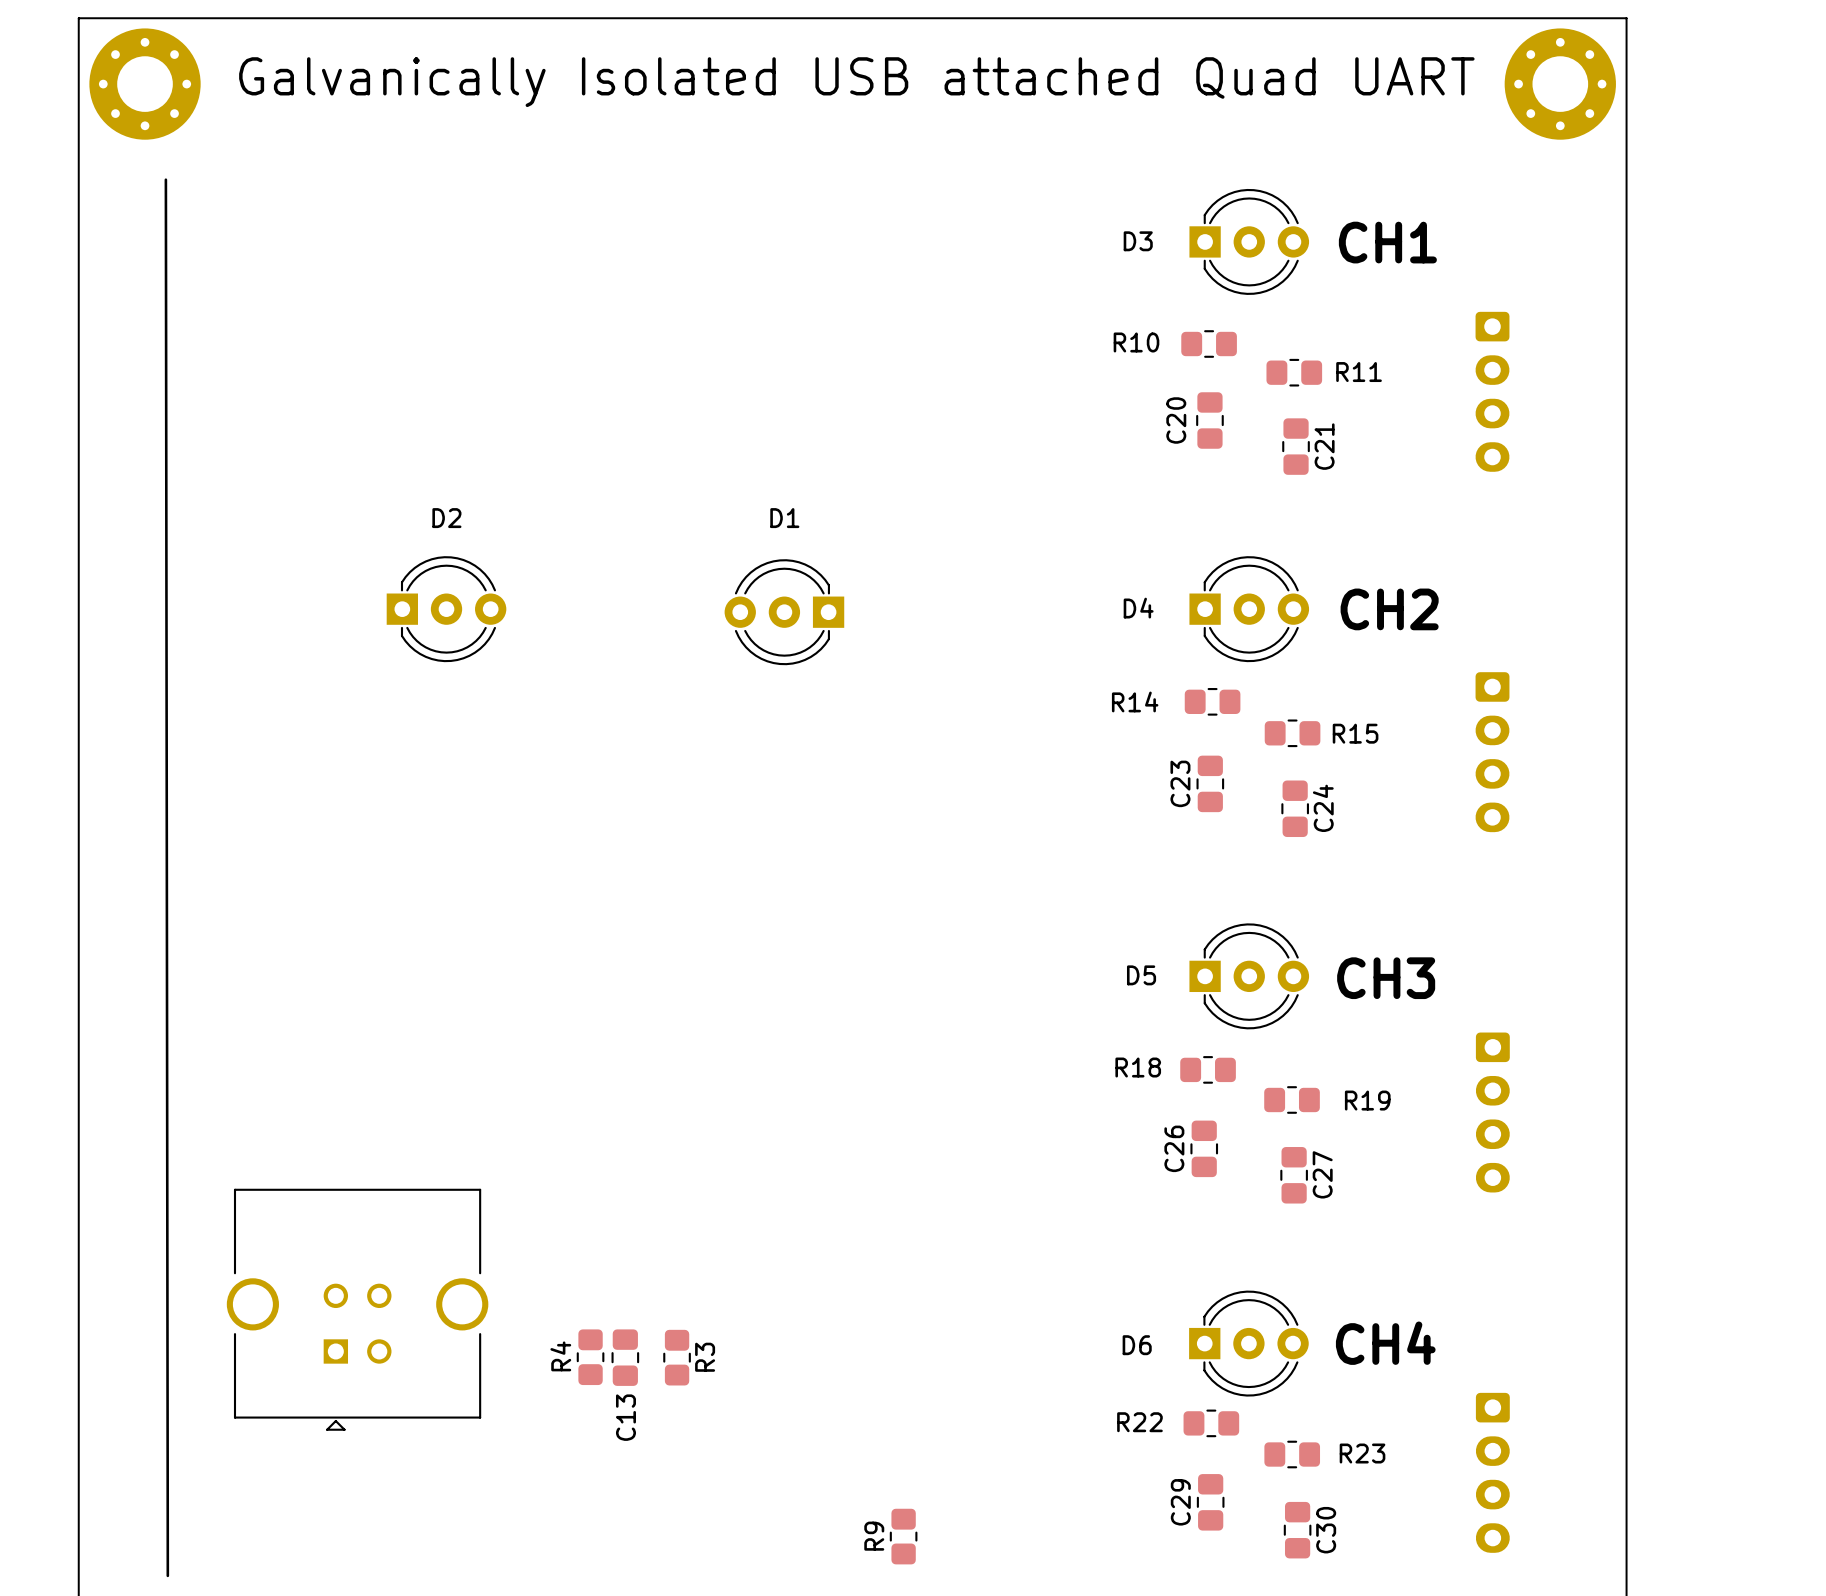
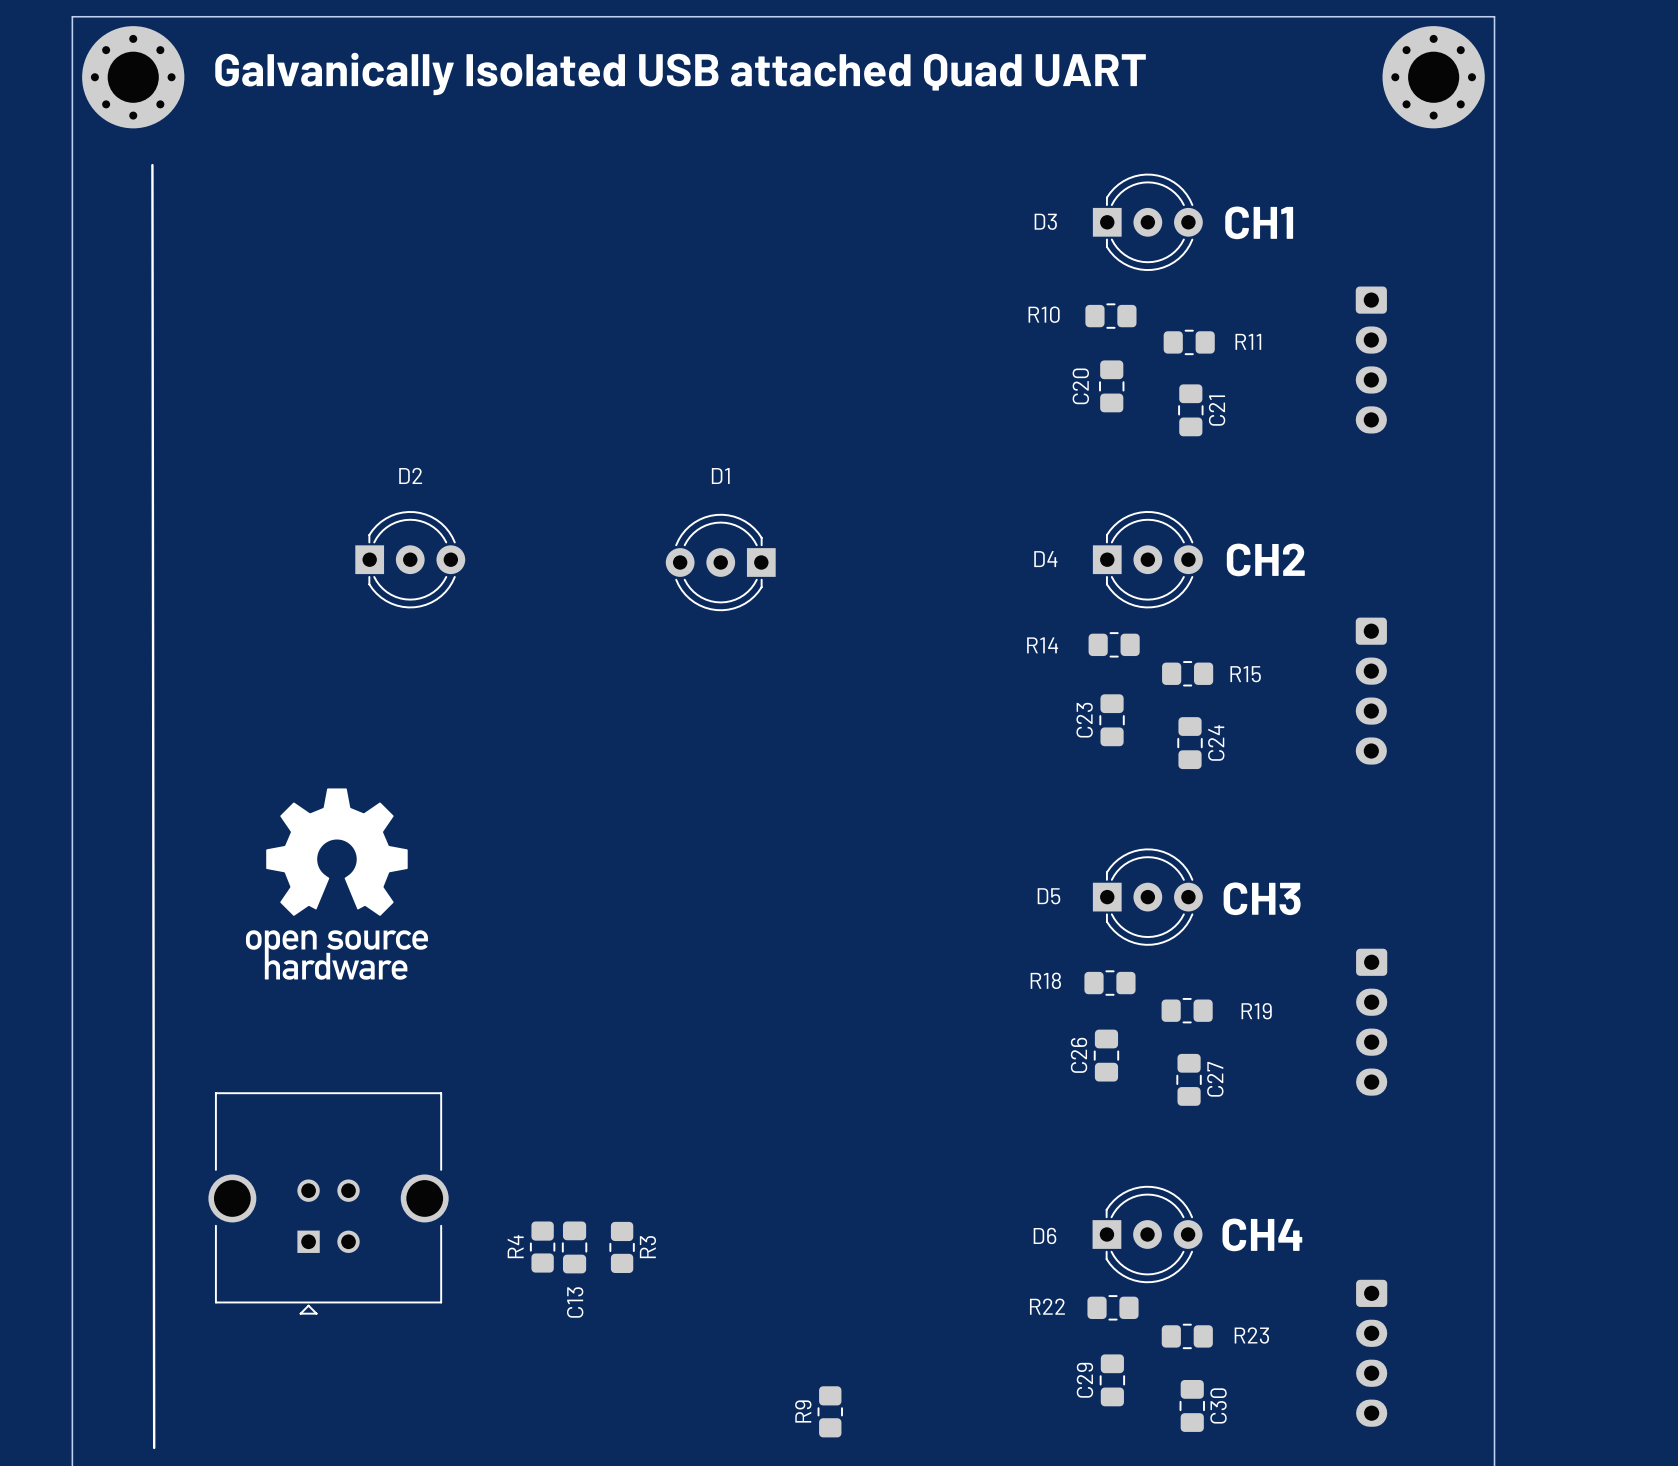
drawing: none -> [245, 788, 428, 980]

